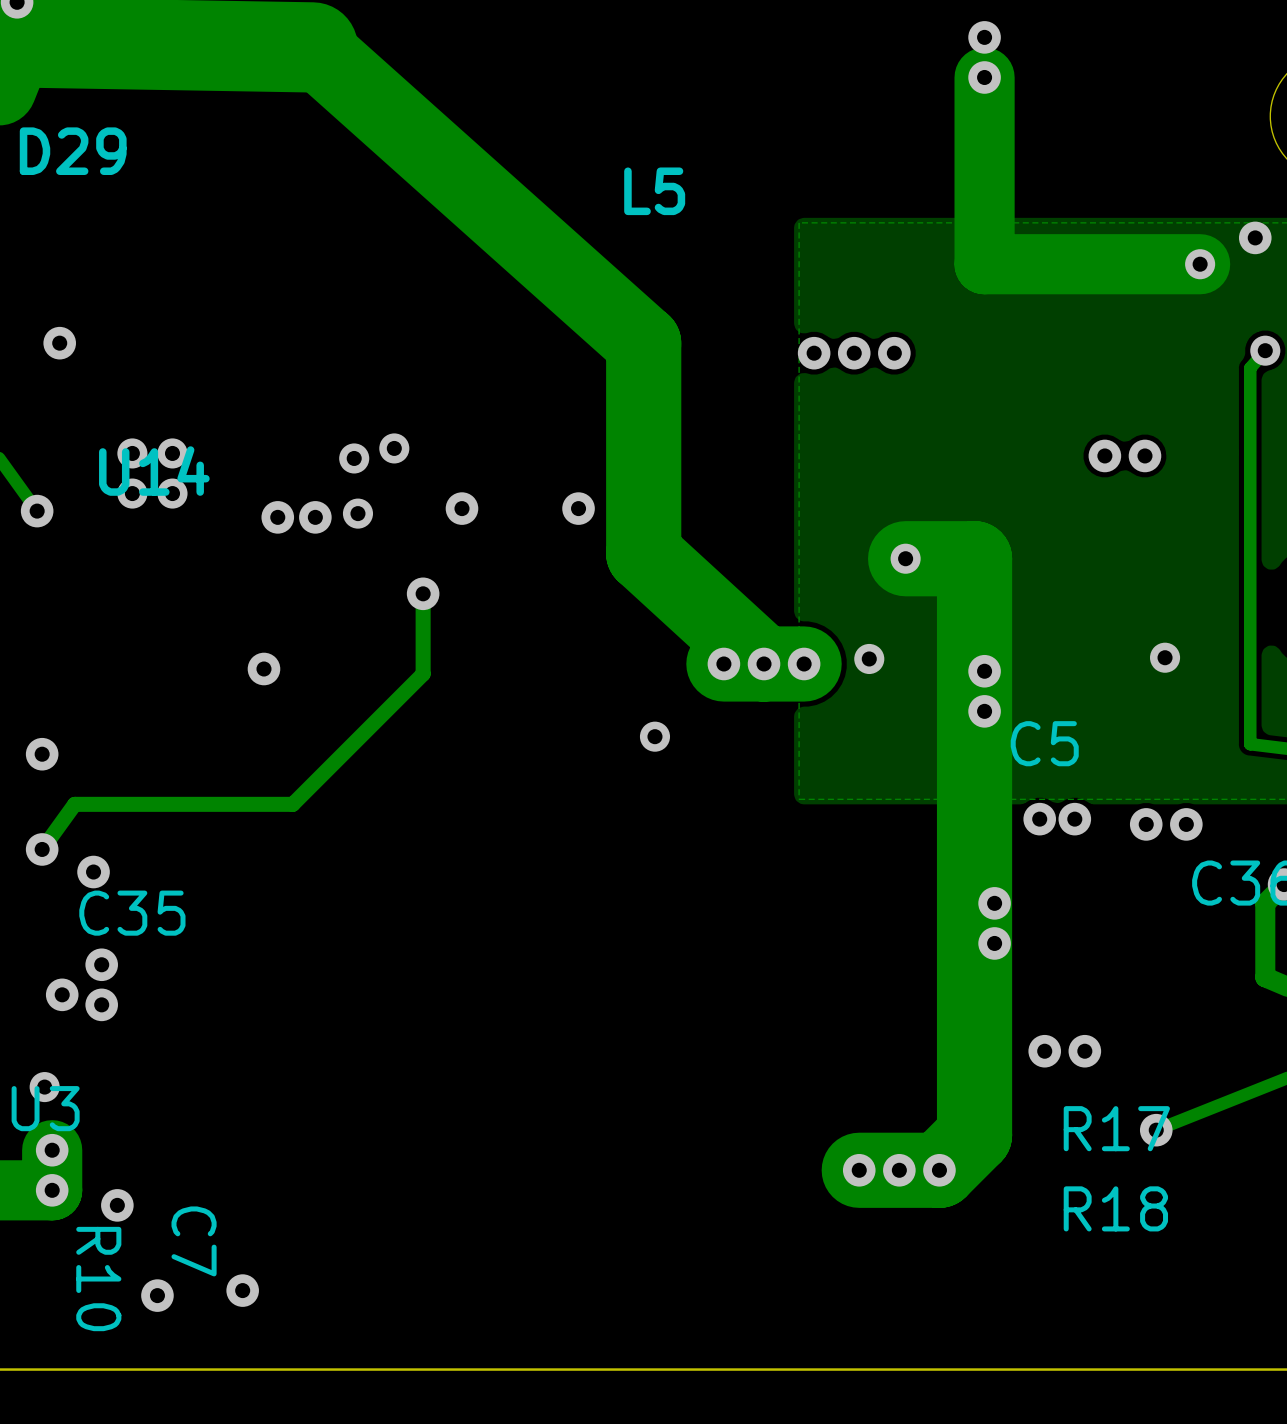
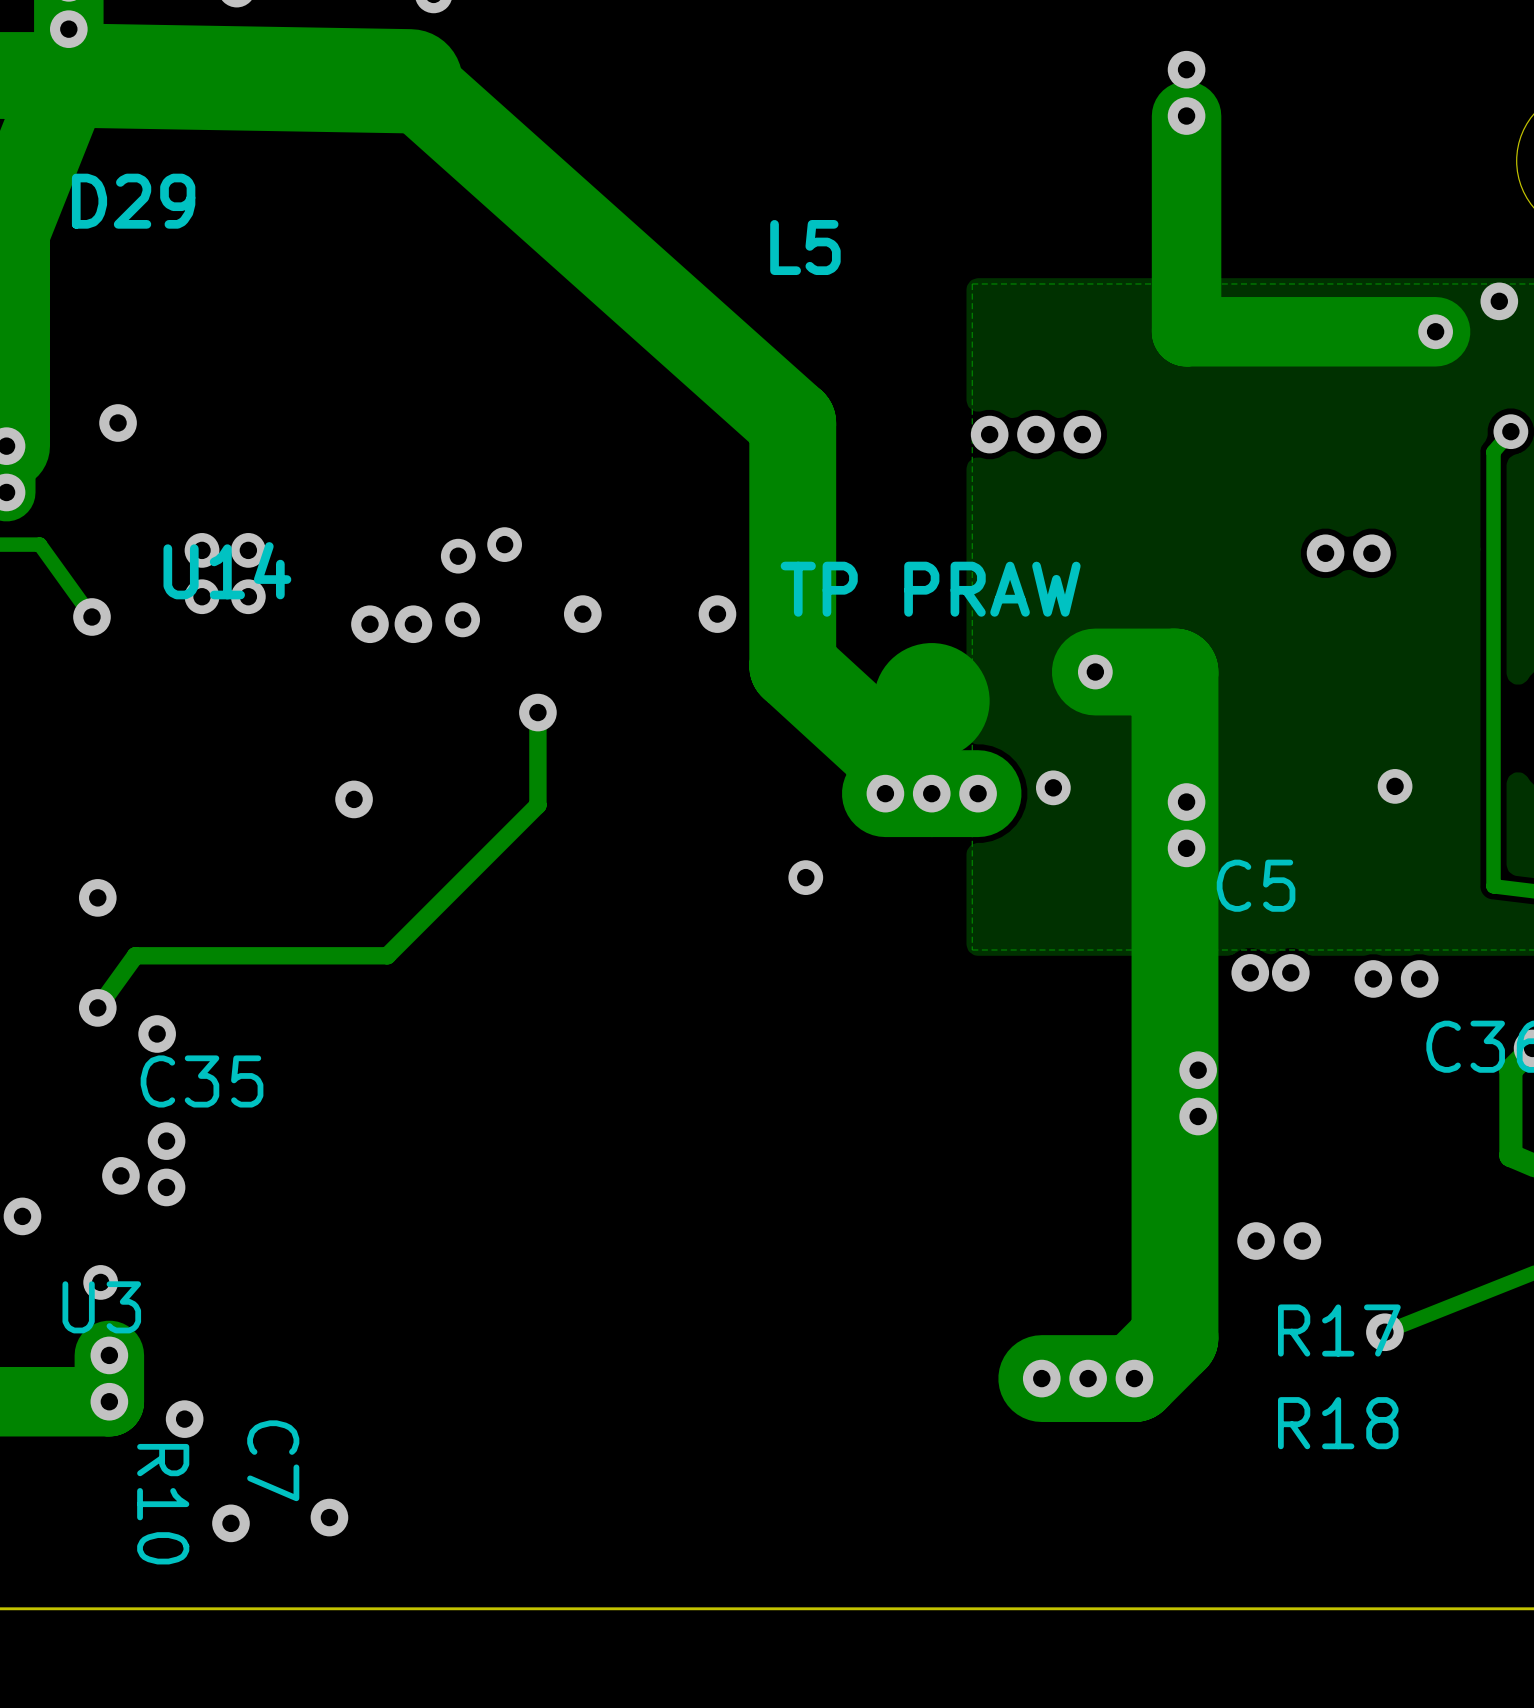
text: none -> TP PRAW (930, 589)
drawing: none -> [873, 643, 990, 759]

